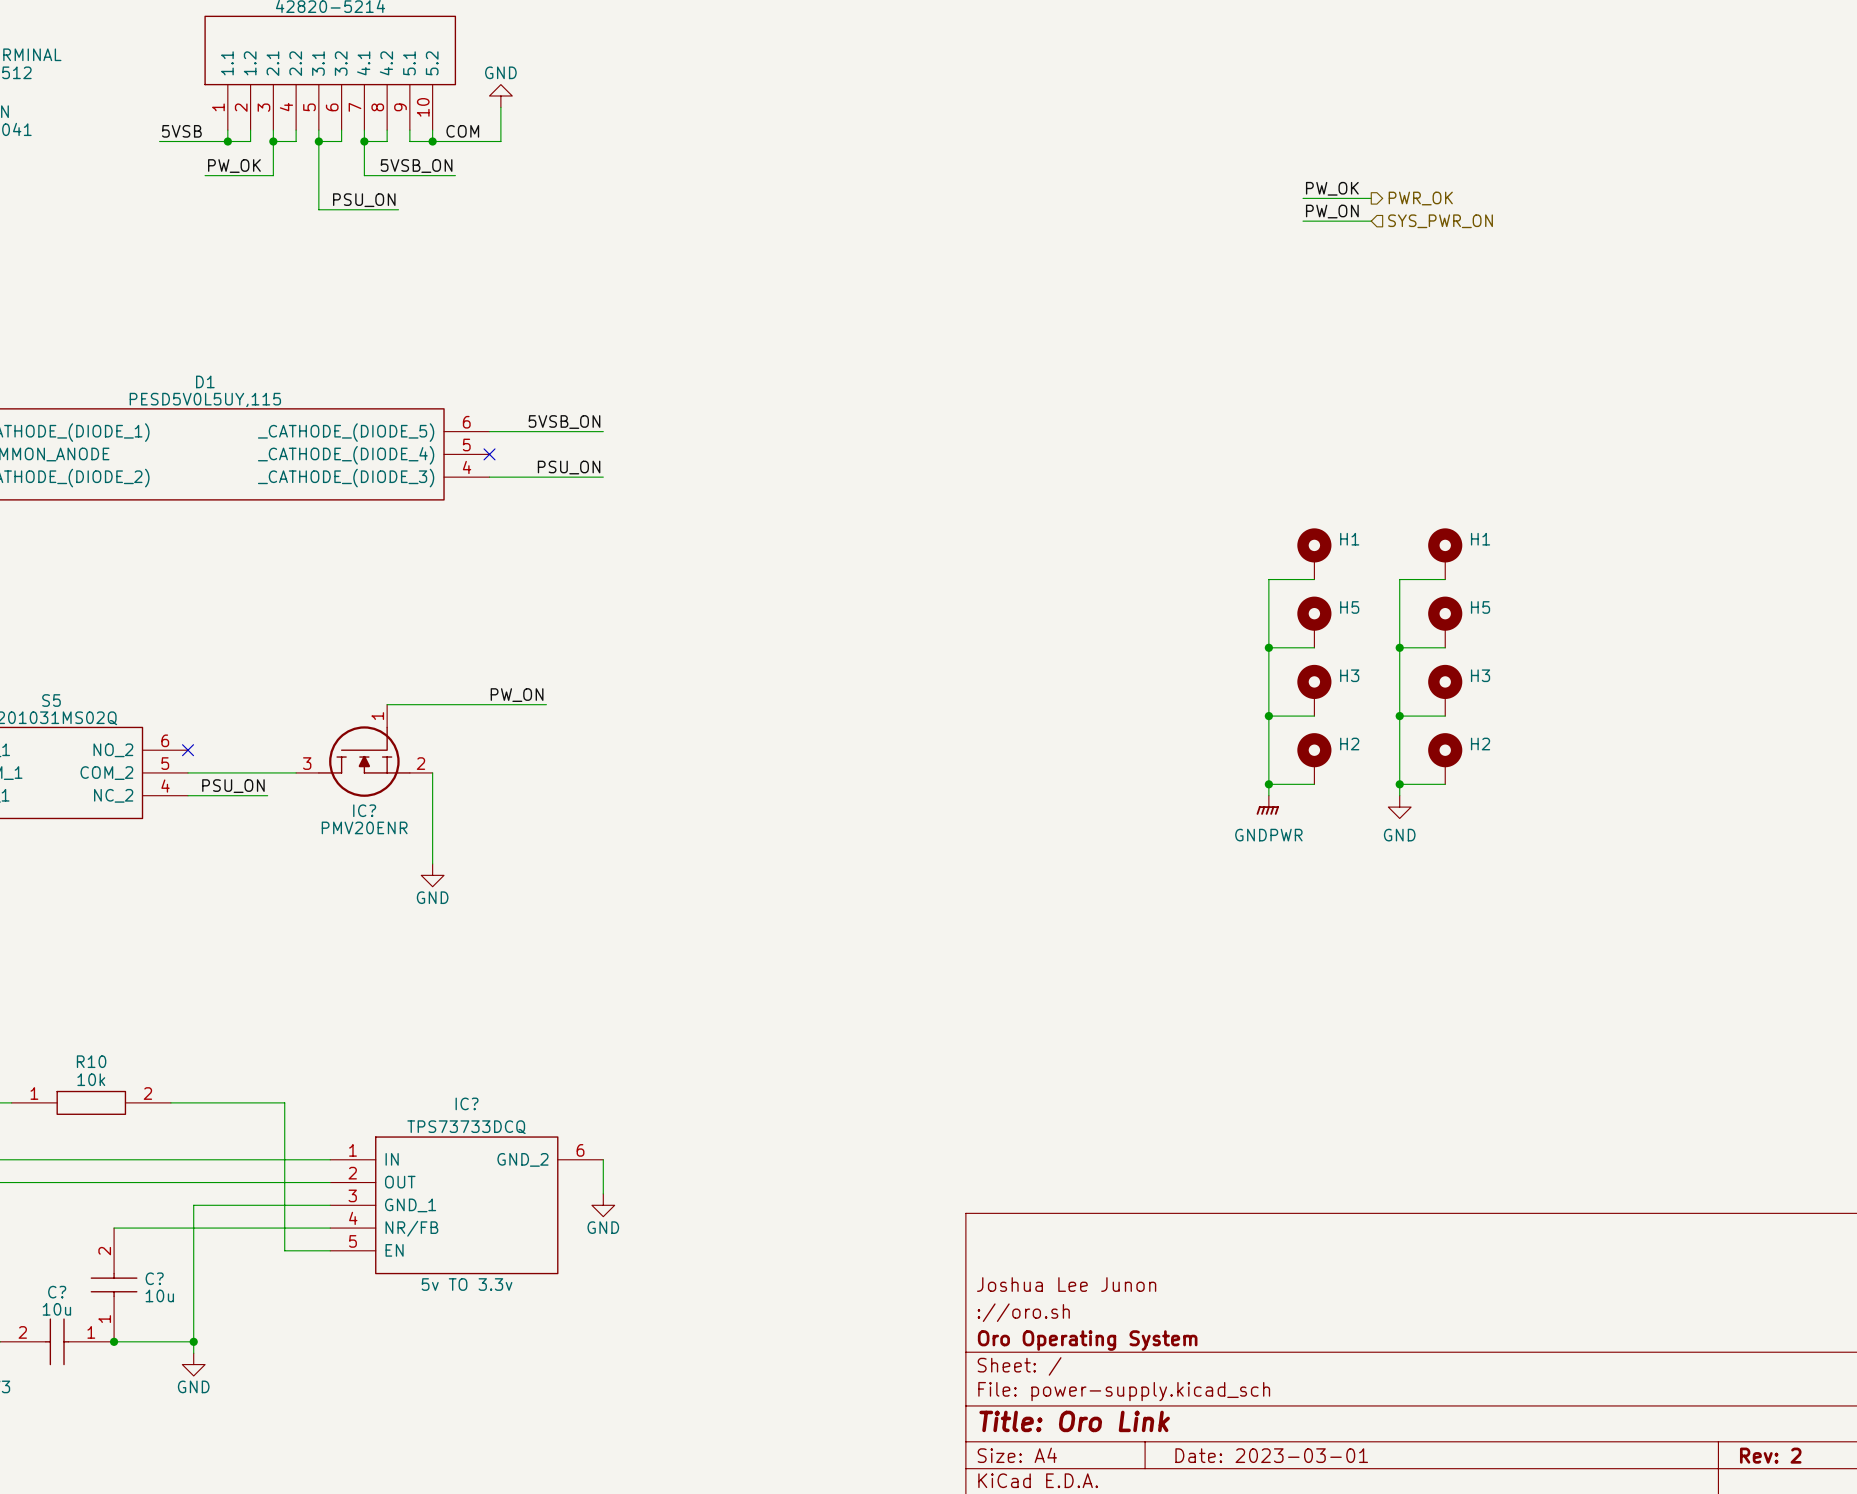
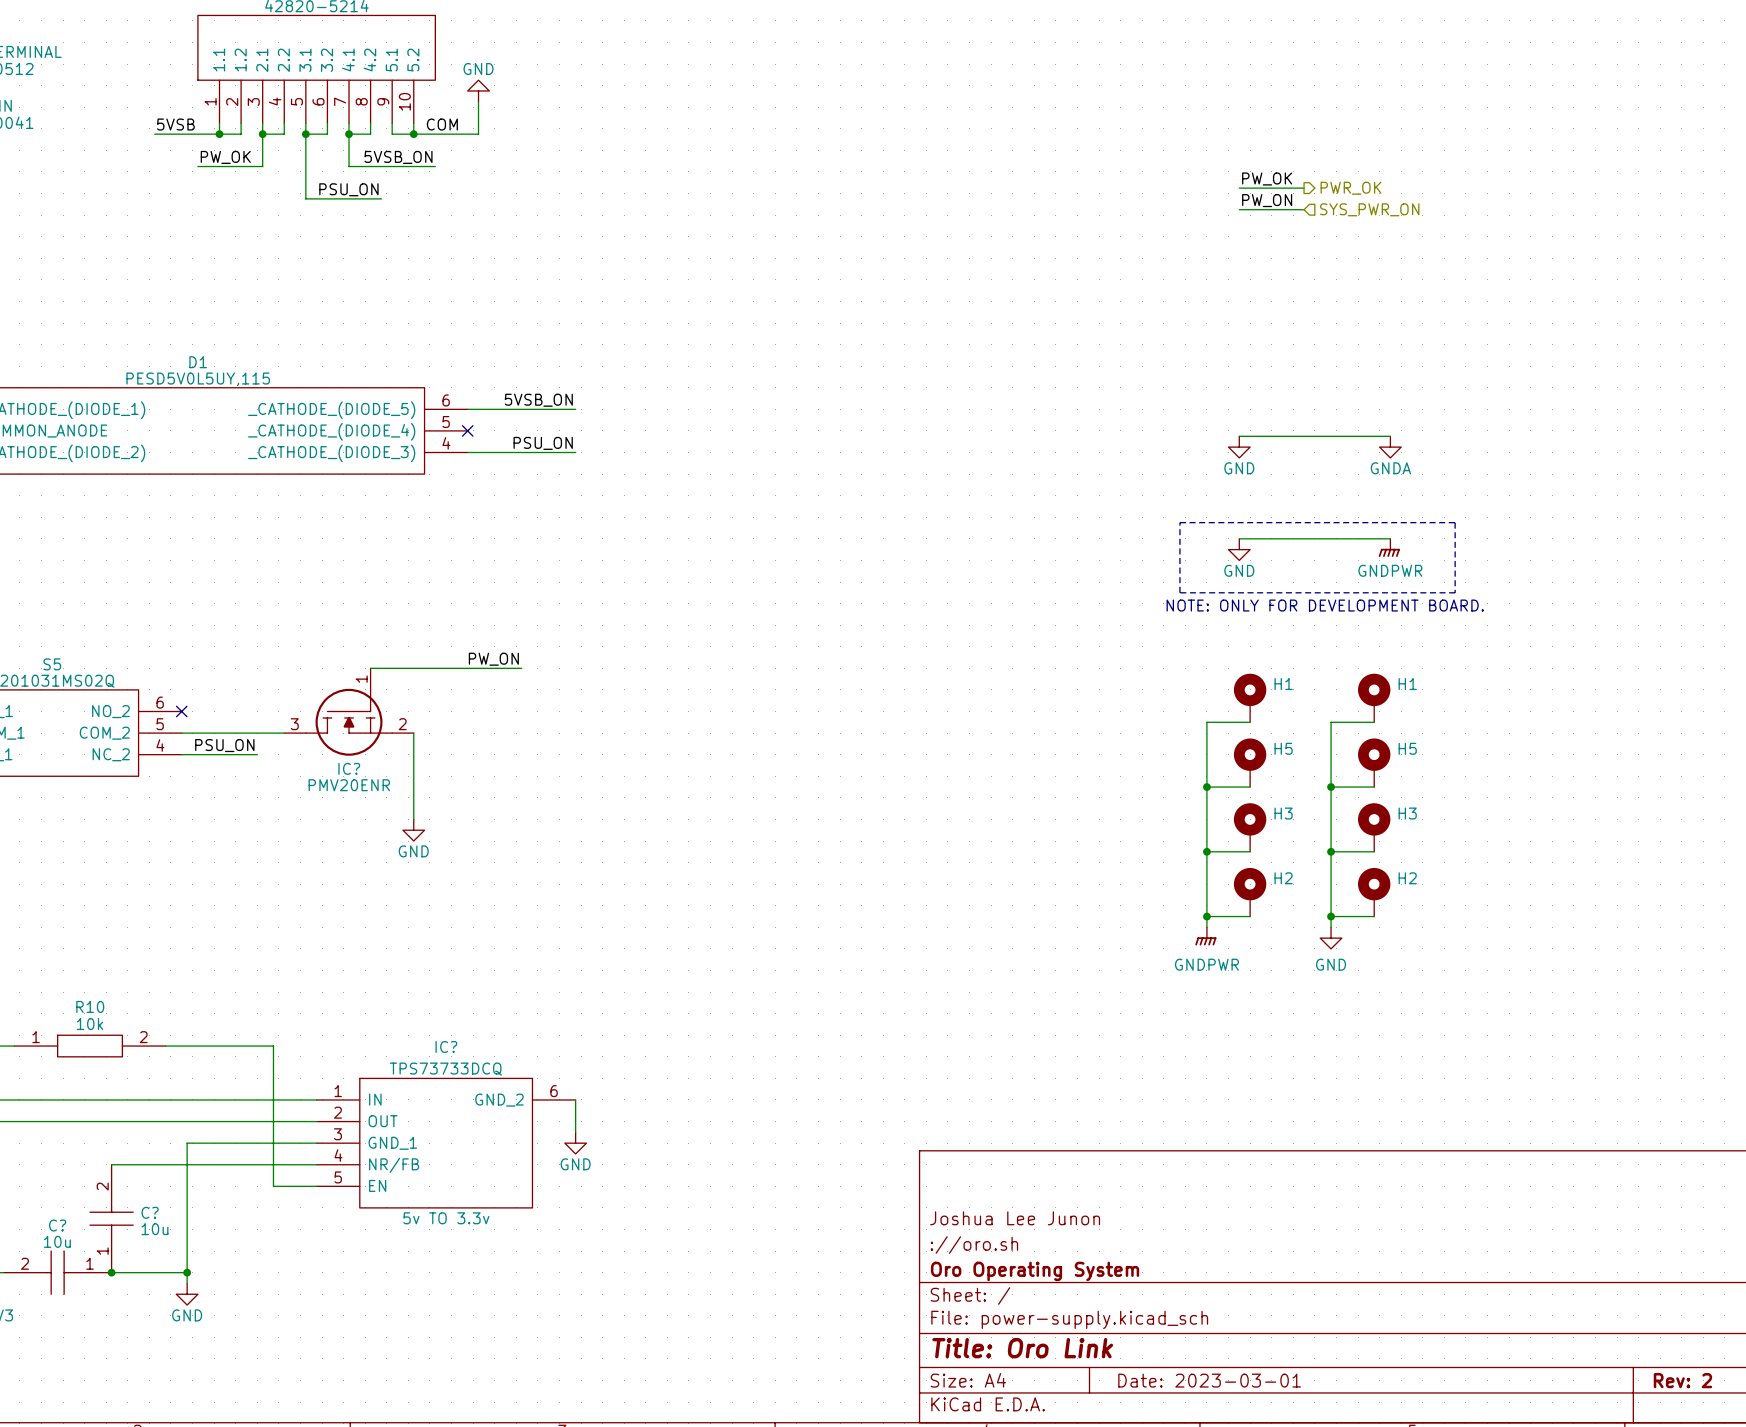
wire: none -> (1239, 436) (1390, 436)
power symbol: none -> GND (1239, 447)
power symbol: none -> GNDA (1390, 447)
line: none -> (1179, 522) (1455, 522) (1455, 592) (1179, 592) (1179, 522)
H1: (1314, 553) -> none
H1: (1445, 553) -> none
wire: none -> (1239, 538) (1390, 538)
power symbol: none -> GNDPWR (1389, 547)
power symbol: none -> GND (1239, 549)
wire: (1314, 579) (1268, 579) (1268, 761) -> (1250, 722) (1206, 722)
wire: (1445, 579) (1399, 579) (1399, 761) -> (1374, 722) (1331, 722)
H5: (1314, 622) -> none
H5: (1445, 622) -> none
text: none -> NOTE: ONLY FOR DEVELOPMENT BOARD. (1325, 605)
wire: (1268, 647) (1314, 647) -> none
junction: (1268, 647) -> none
wire: (1399, 647) (1445, 647) -> none
junction: (1399, 647) -> none
H3: (1314, 690) -> none
H3: (1445, 690) -> none
wire: (1268, 716) (1314, 716) -> (1206, 787) (1250, 787)
junction: (1268, 716) -> none
wire: (1399, 716) (1445, 716) -> (1331, 787) (1374, 787)
junction: (1399, 716) -> none
H1: none -> (1250, 698)
H1: none -> (1374, 698)
H2: (1314, 758) -> none
H2: (1445, 758) -> none
wire: (1268, 784) (1314, 784) -> (1206, 851) (1250, 851)
junction position: (1268, 784) -> (1206, 787)
wire: (1399, 784) (1445, 784) -> (1331, 851) (1374, 851)
junction position: (1399, 784) -> (1331, 787)
wire: none -> (1206, 754) (1206, 927)
wire: none -> (1331, 754) (1331, 927)
H5: none -> (1250, 762)
H5: none -> (1374, 762)
power symbol: GNDPWR (1267, 805) -> none
power symbol: GND (1399, 807) -> none
H3: none -> (1250, 827)
H3: none -> (1374, 827)
junction: none -> (1206, 851)
junction: none -> (1331, 851)
H2: none -> (1250, 892)
H2: none -> (1374, 892)
wire: none -> (1206, 916) (1250, 916)
junction: none -> (1206, 916)
wire: none -> (1331, 916) (1374, 916)
junction: none -> (1331, 916)
power symbol: none -> GNDPWR (1205, 936)
power symbol: none -> GND (1331, 938)

